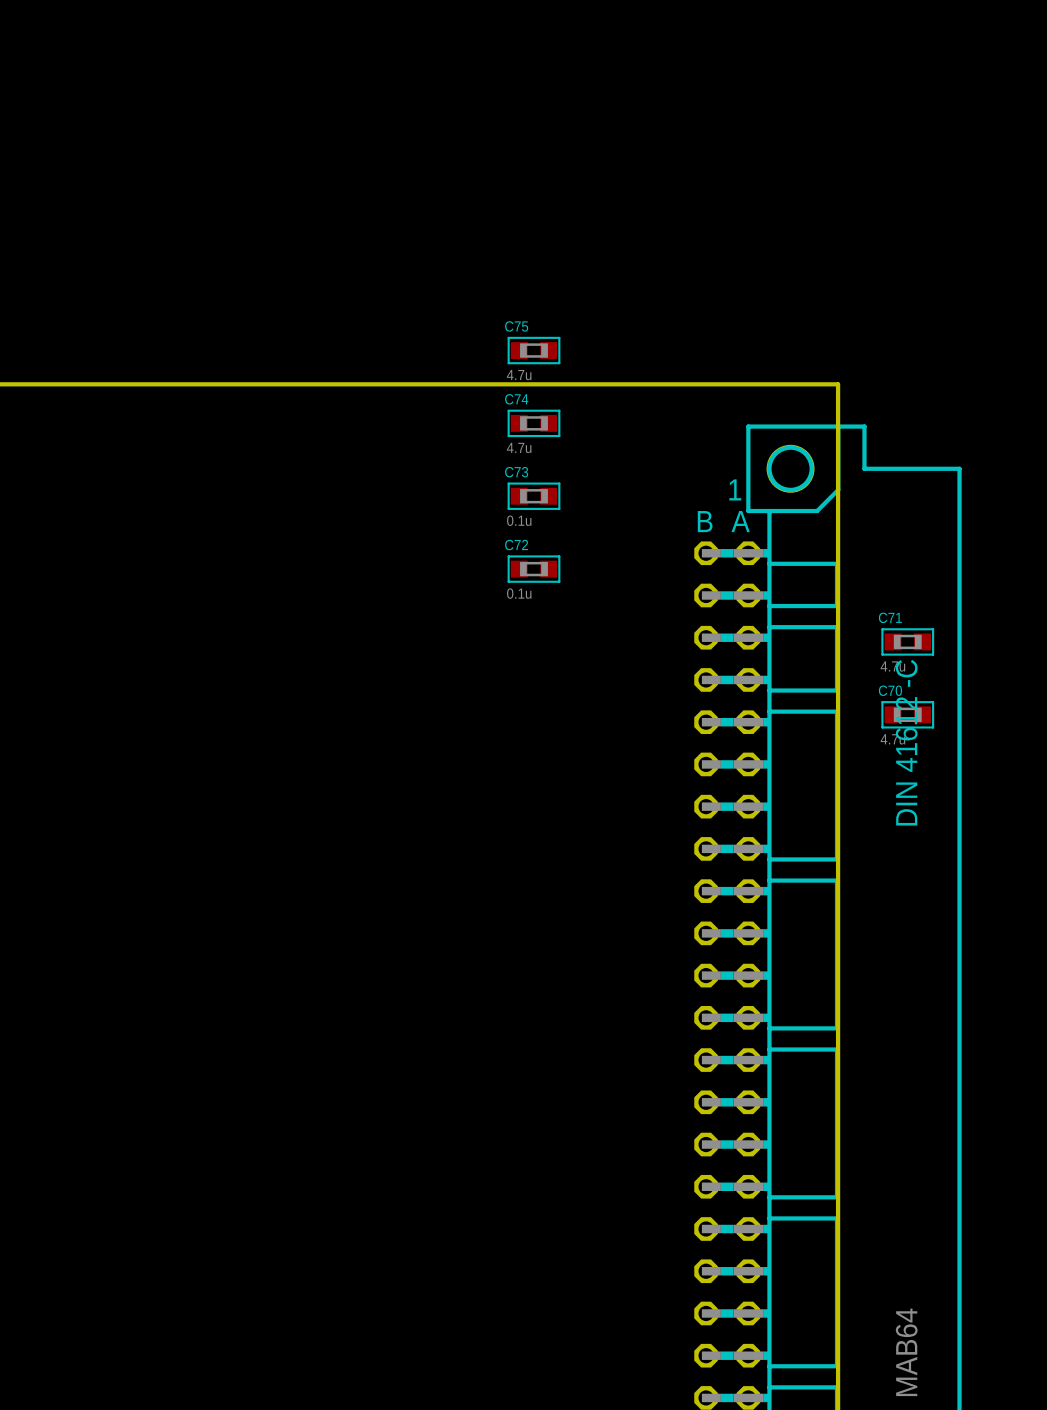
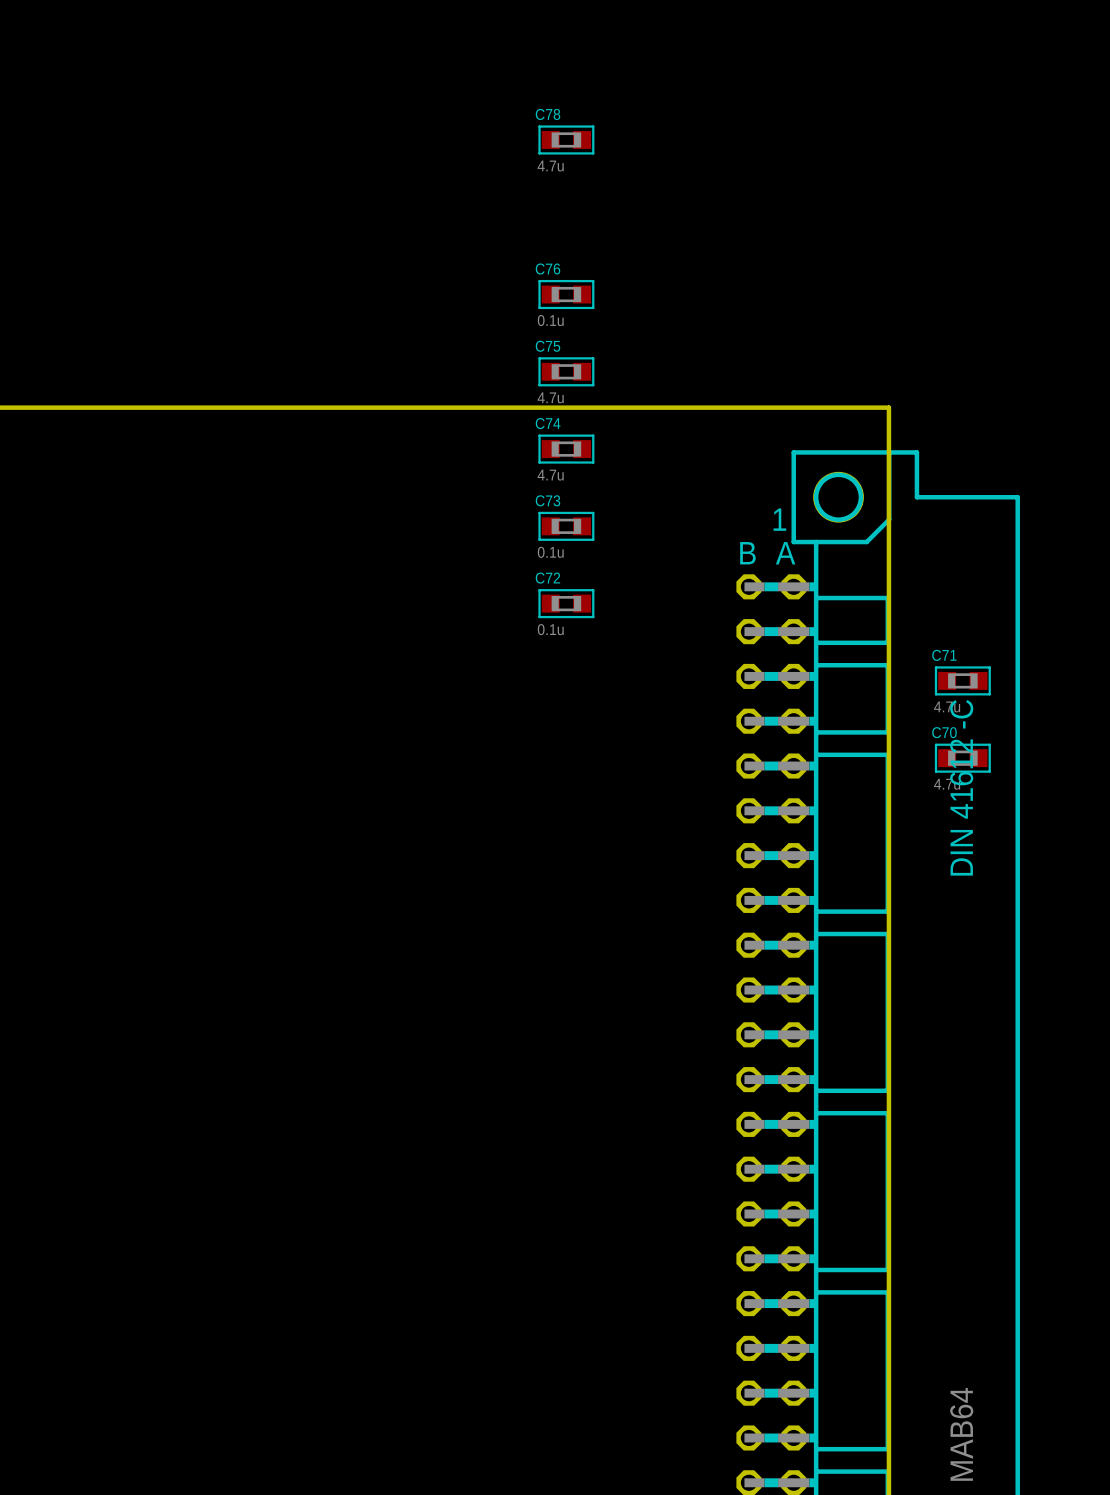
C78: none -> 4.7u (566, 139)
C76: none -> 0.1u (566, 294)

